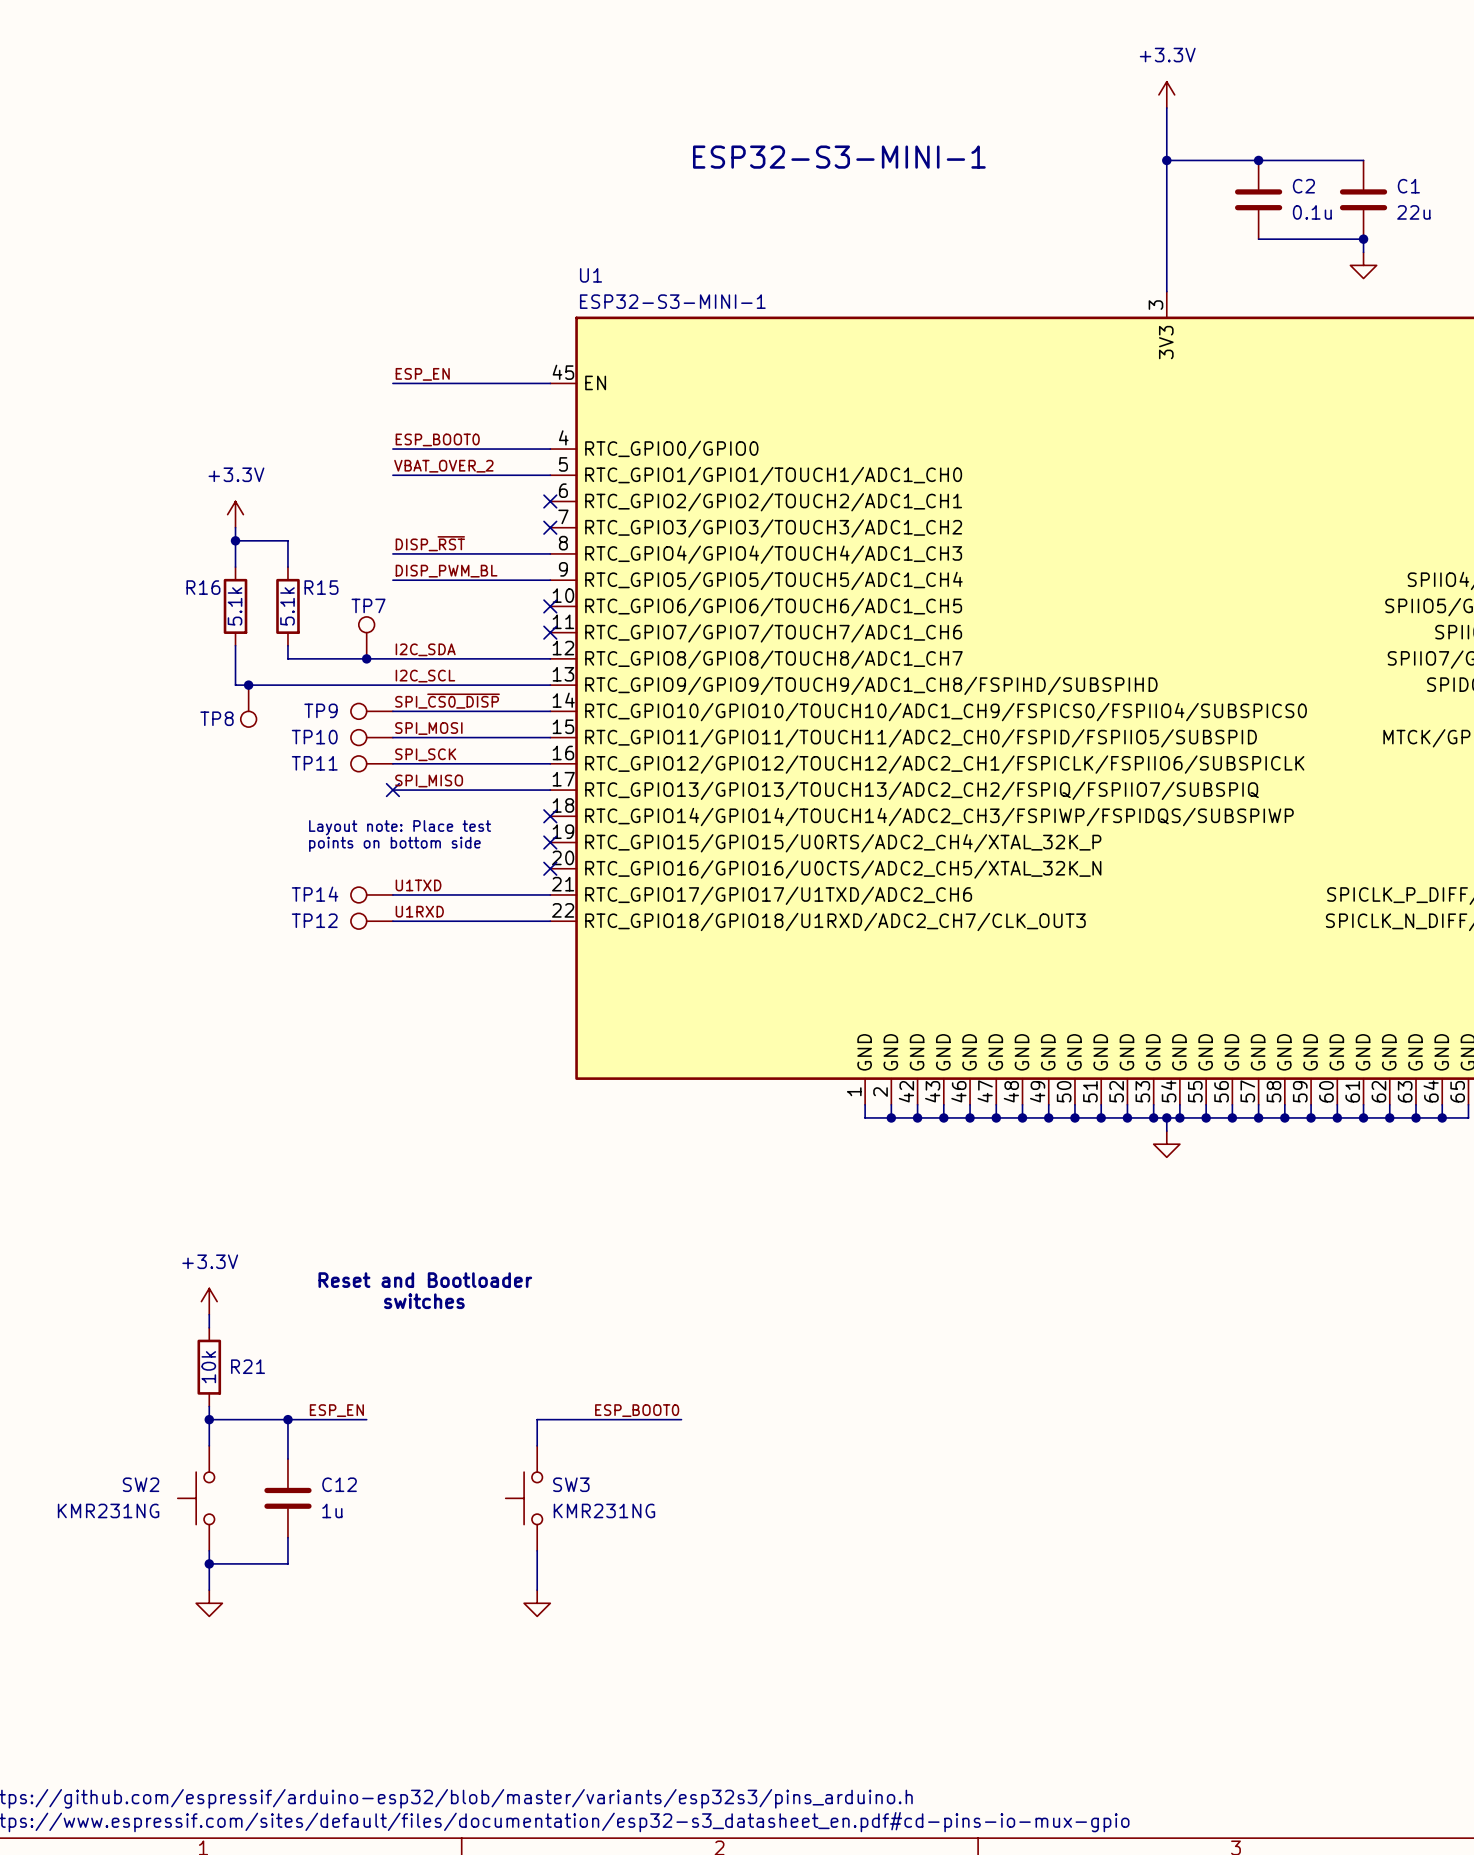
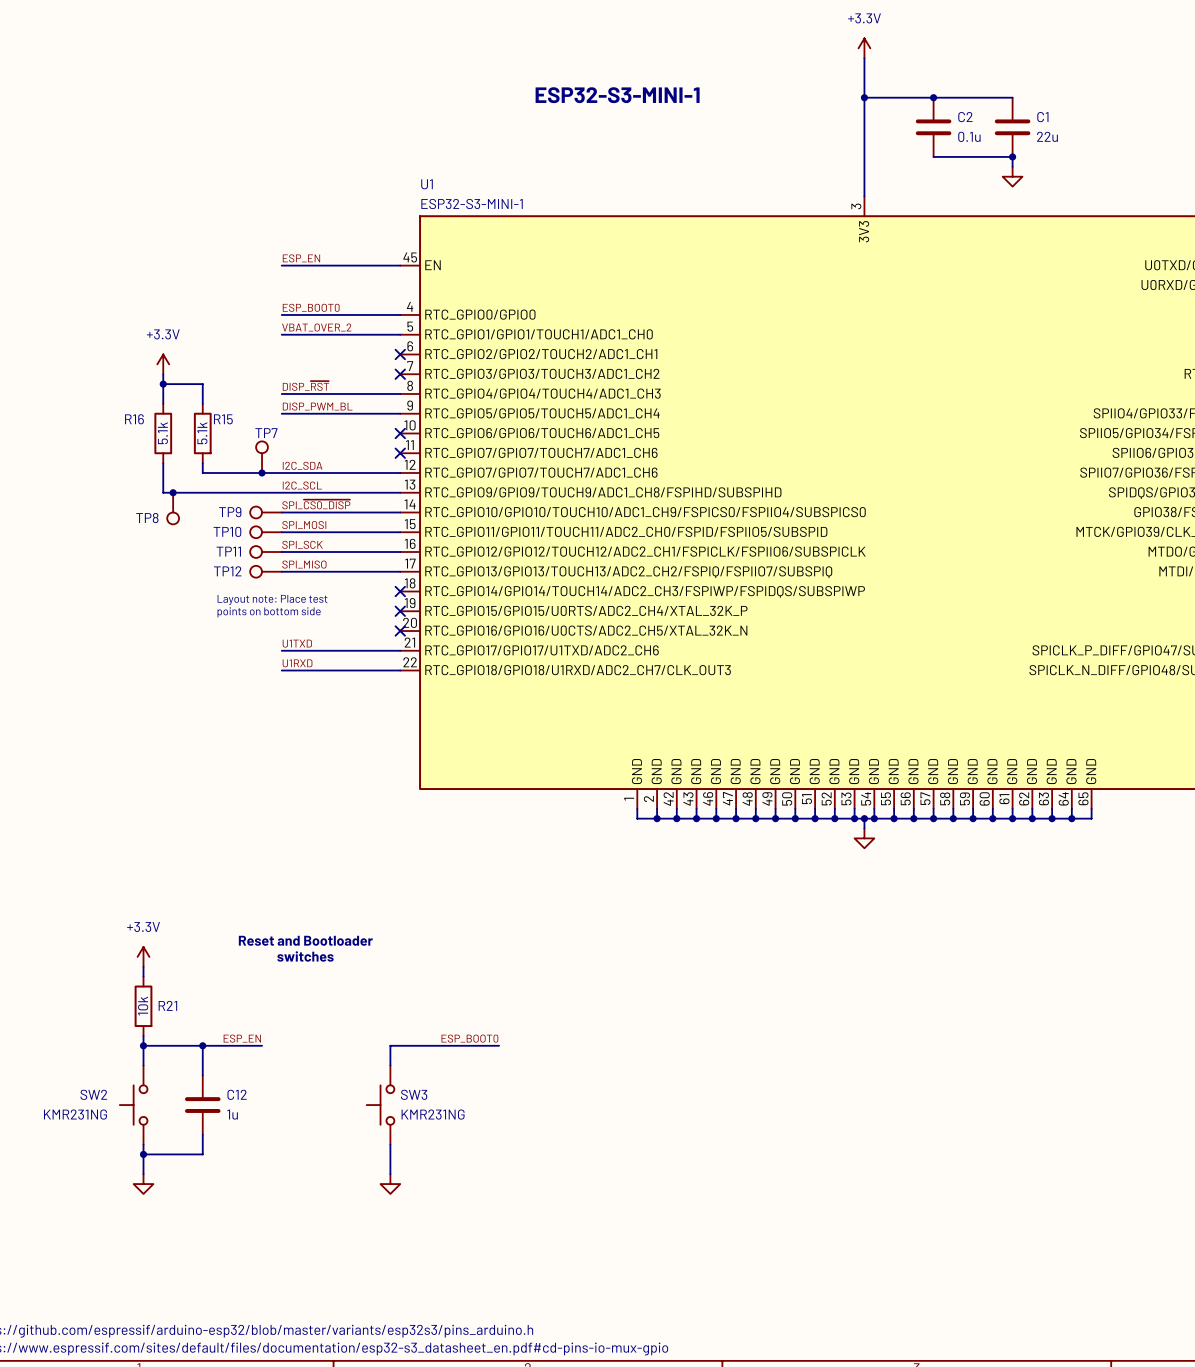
U1 pin name: RTC_GPIO8/GPIO8/TOUCH8/ADC1_CH7 (773, 659) -> RTC_GPIO7/GPIO7/TOUCH7/ADC1_CH6 (541, 472)
no-connect mark: (392, 790) -> none
TP14: (371, 894) -> none
TP12 position: (371, 921) -> (265, 571)

